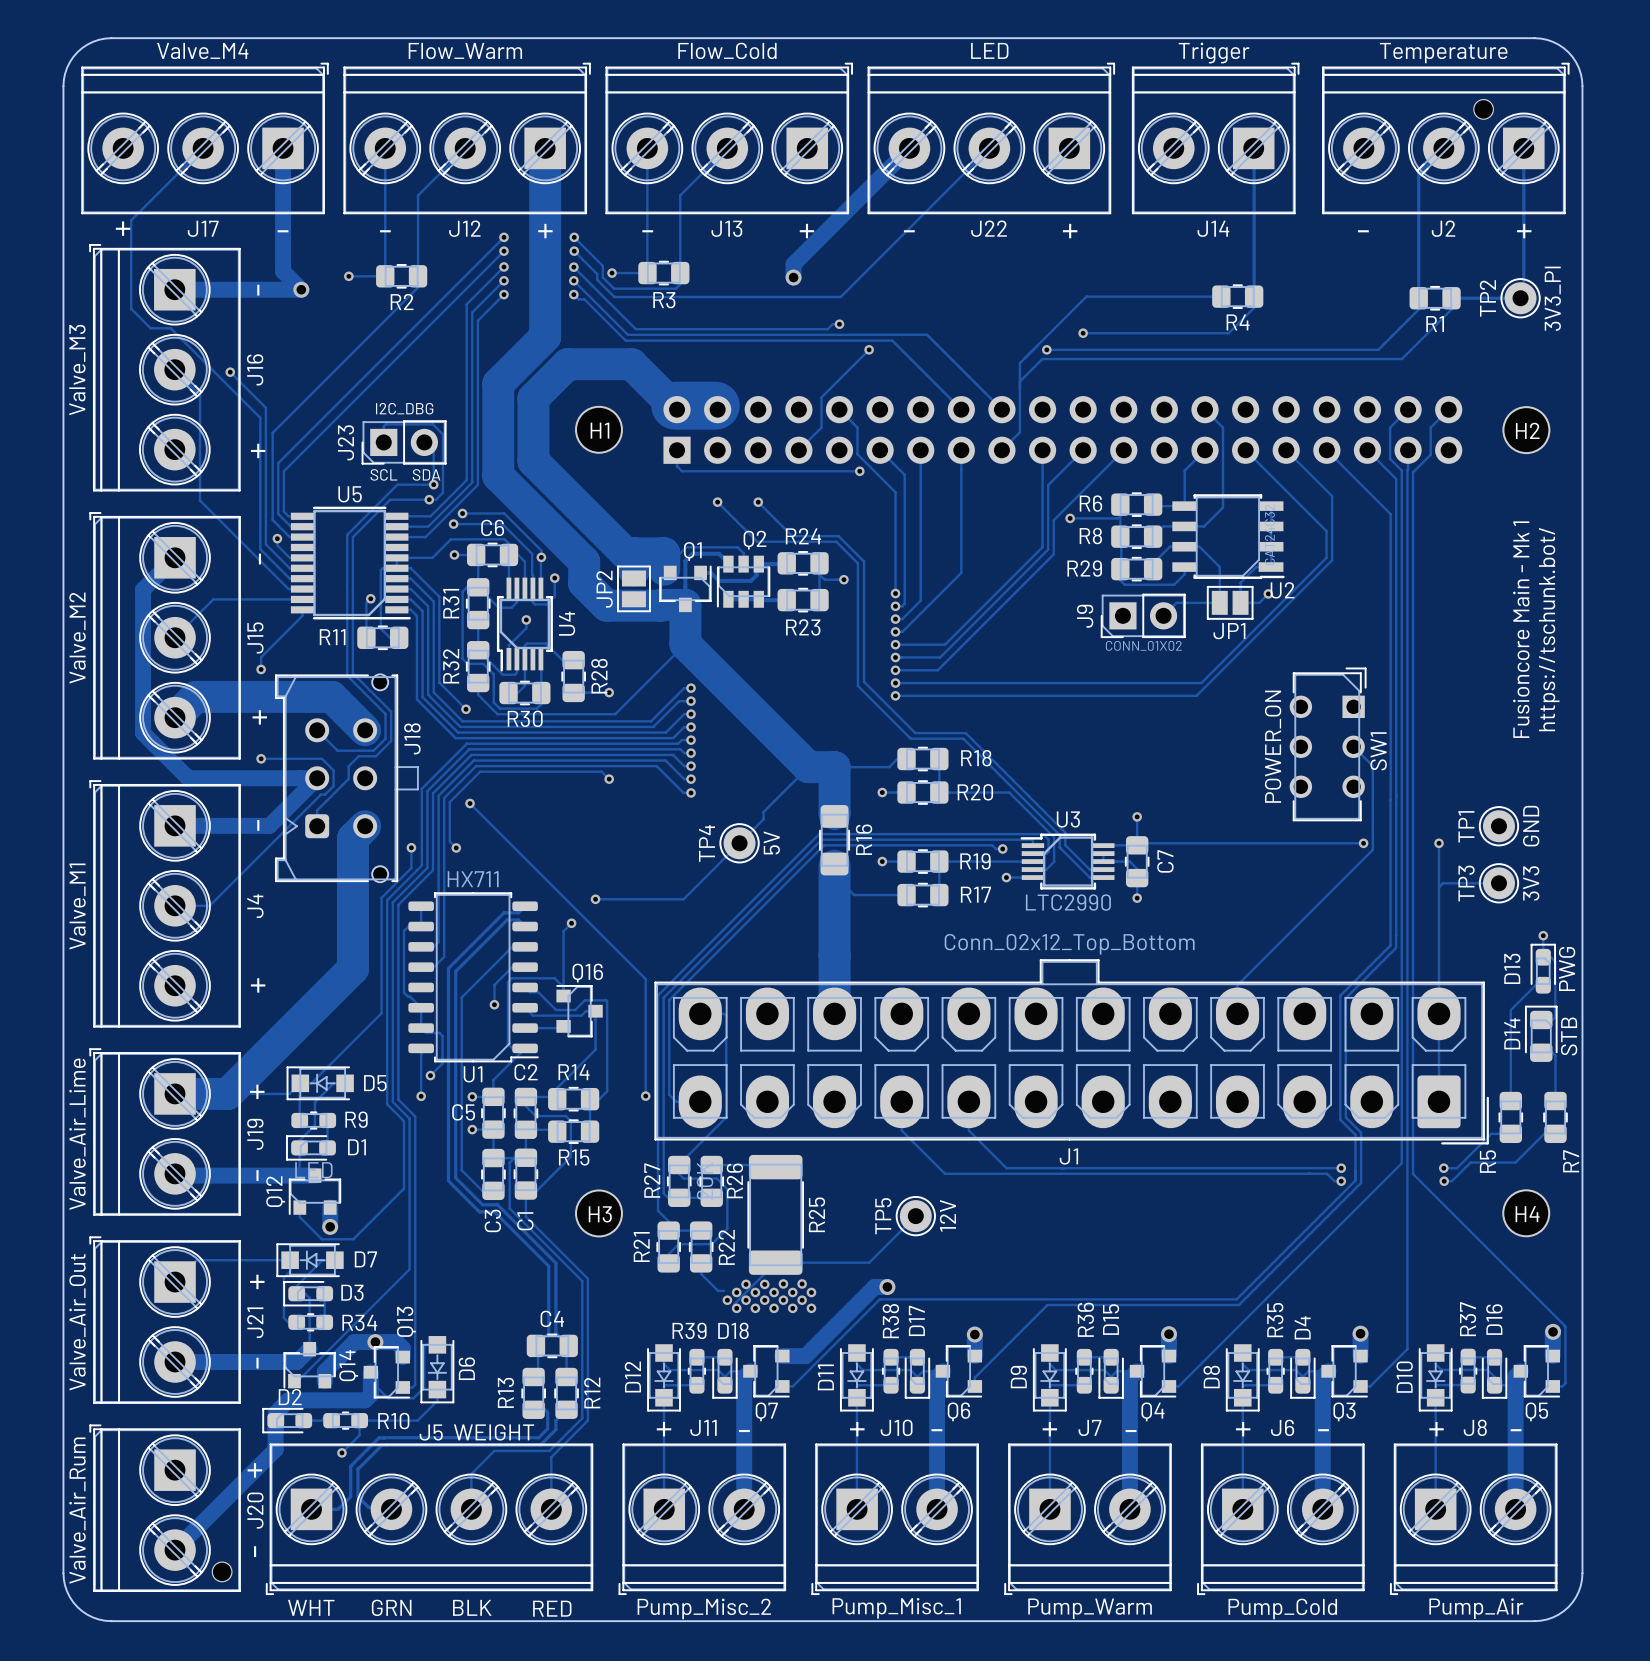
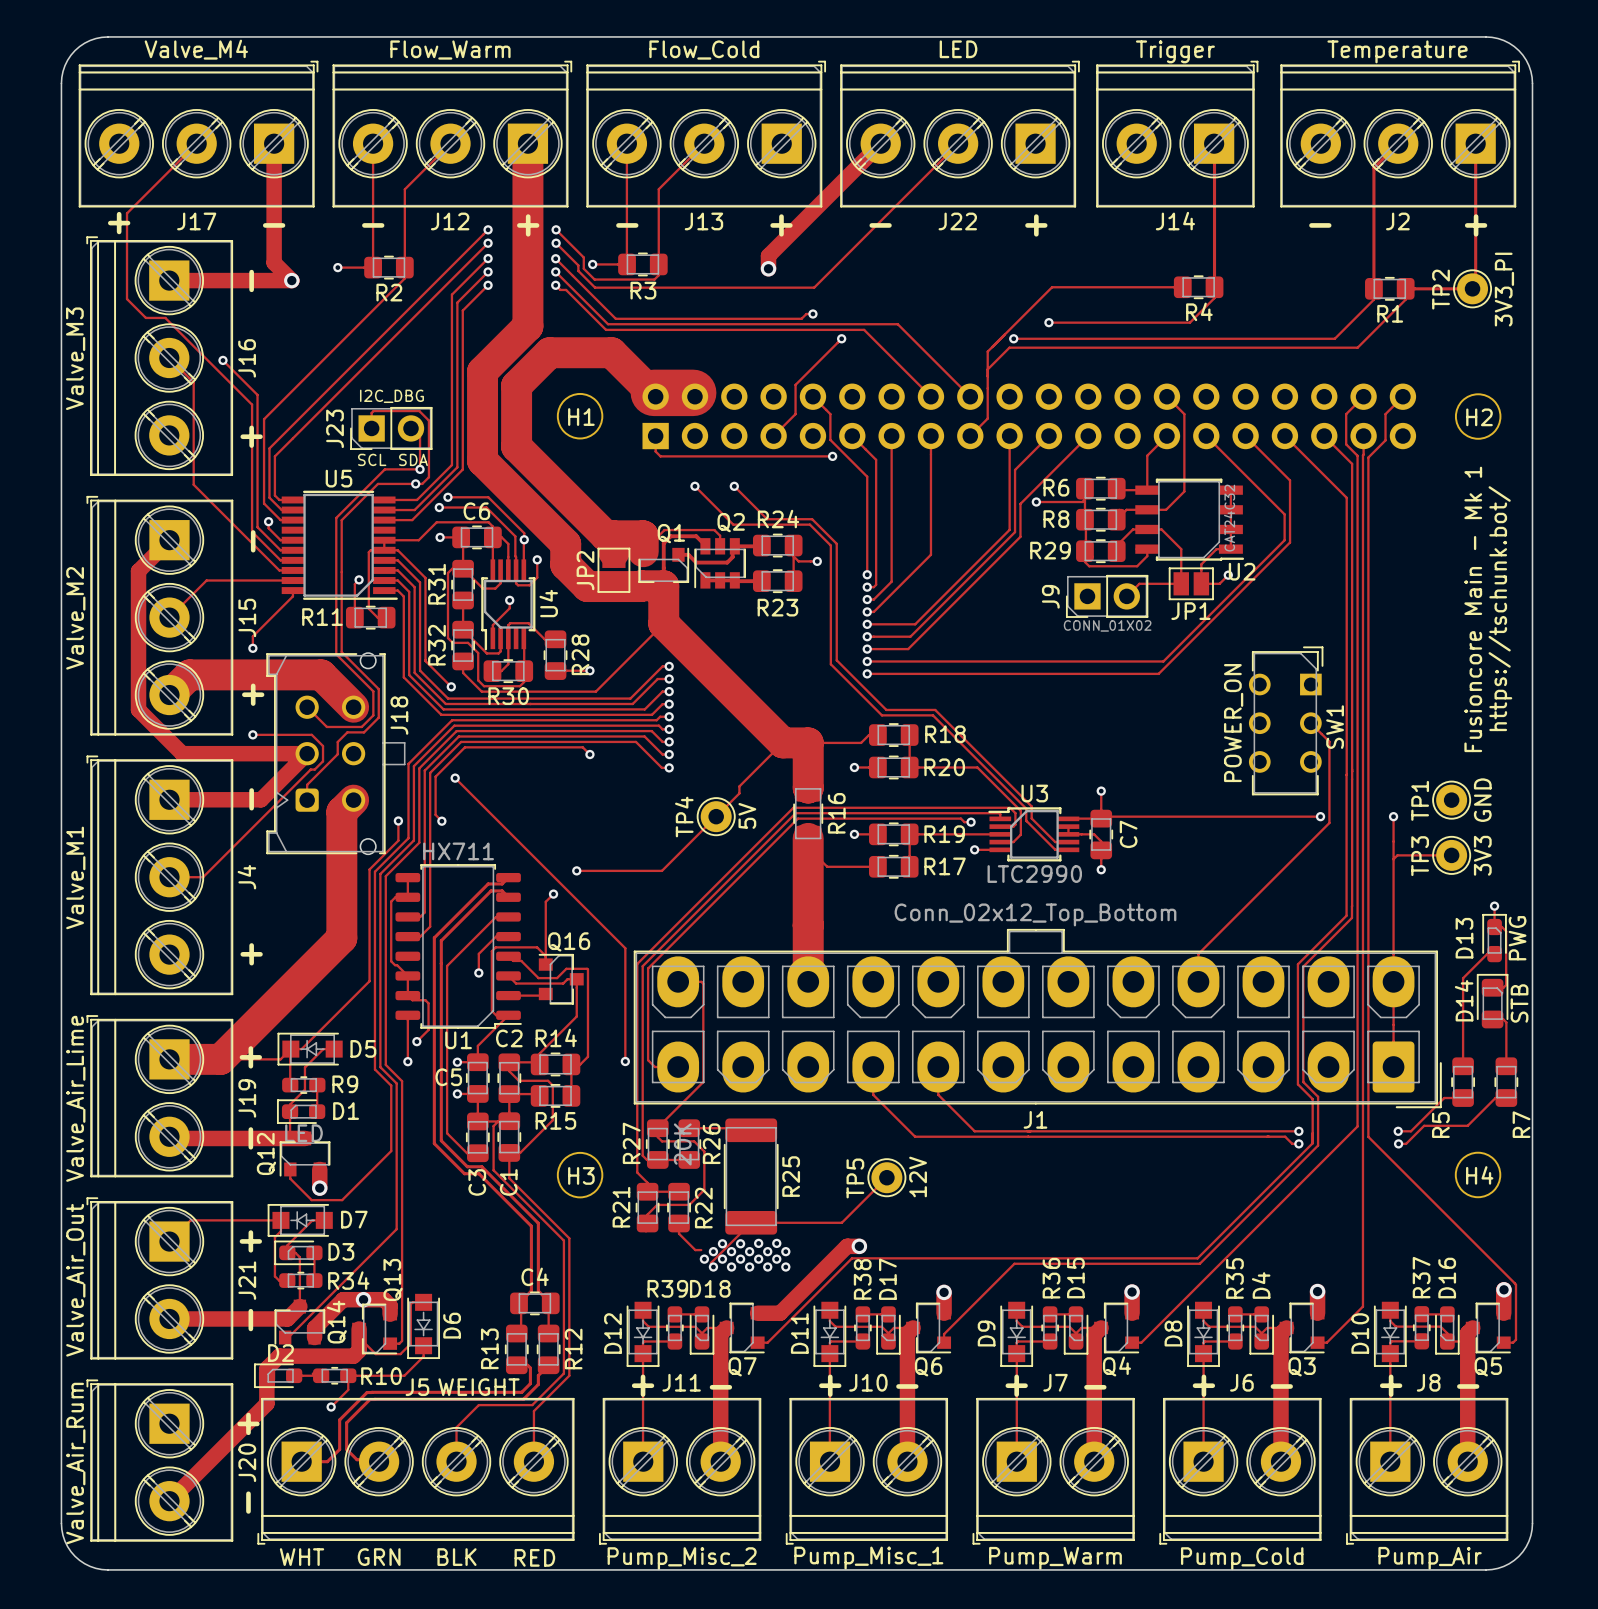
part: (1483, 109) -> none
part: (222, 1571) -> none

